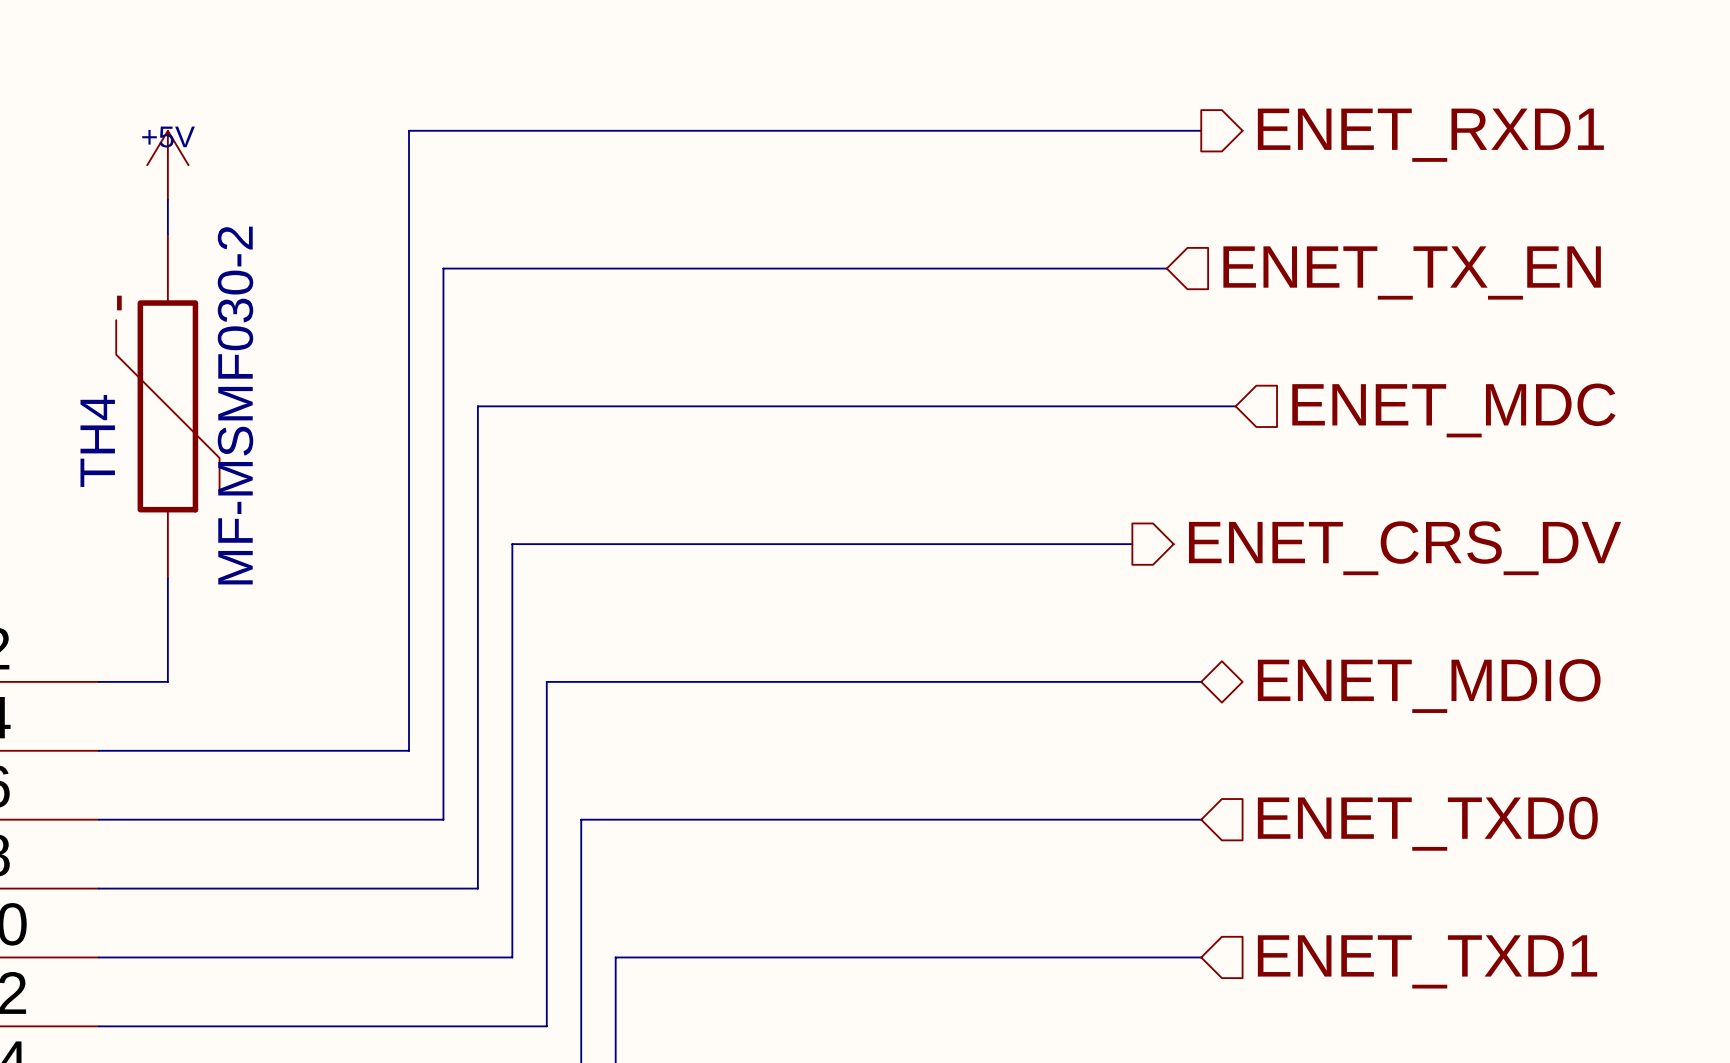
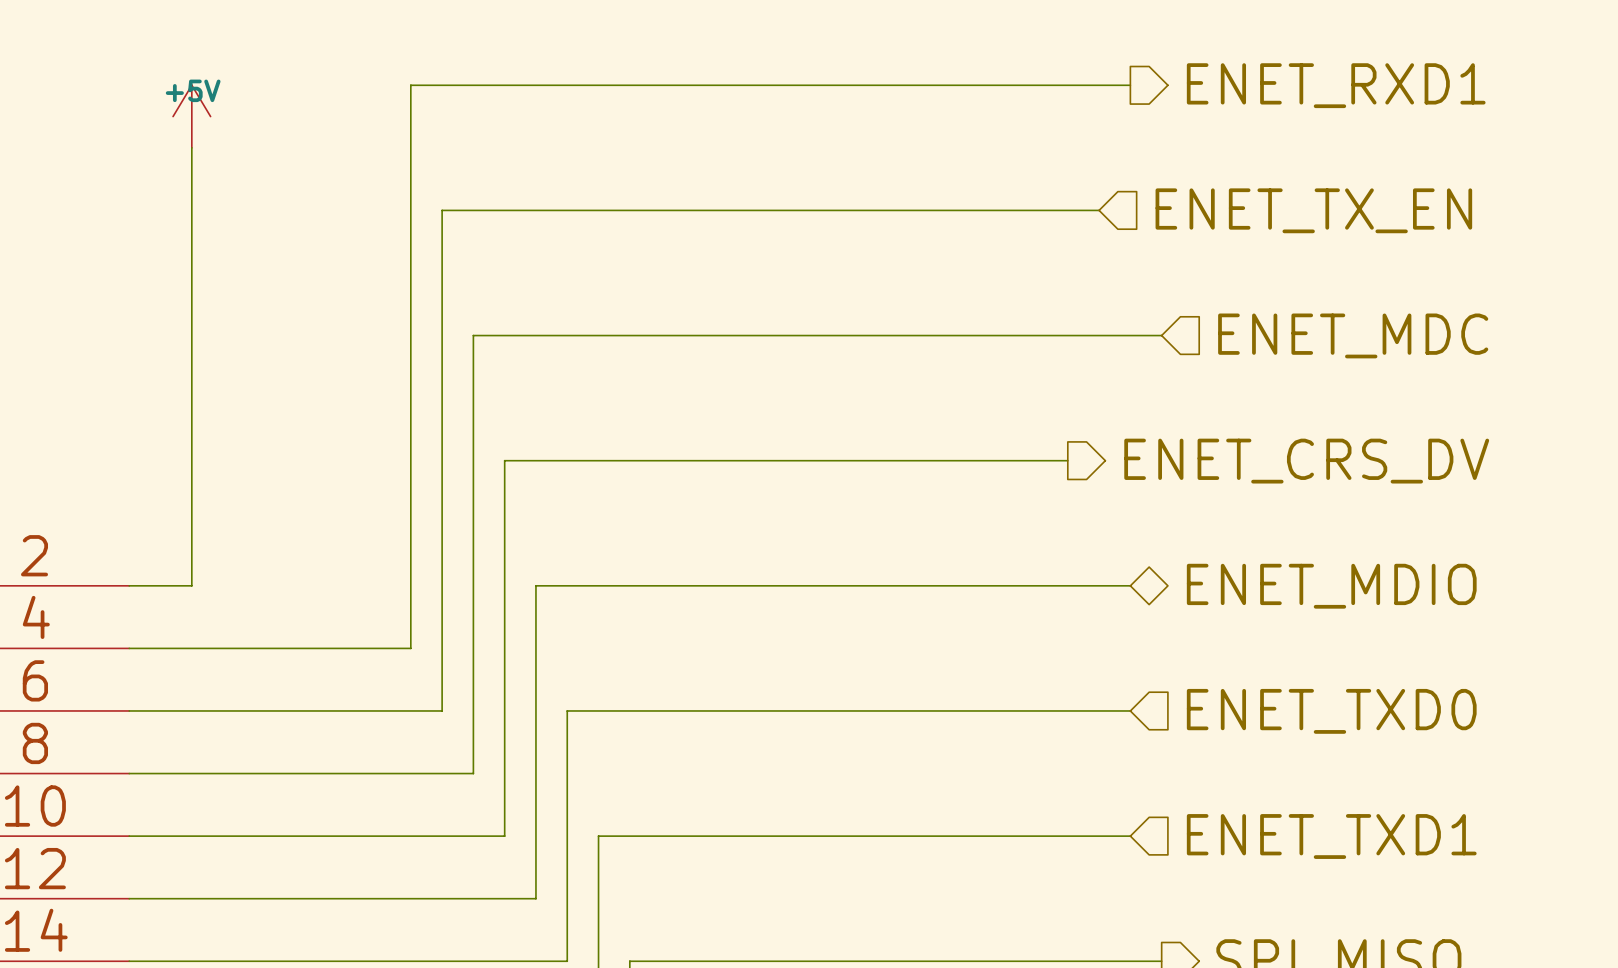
wire: none -> (191, 179) (191, 491)
TH4: MF-MSMF030-2 (167, 406) -> none

